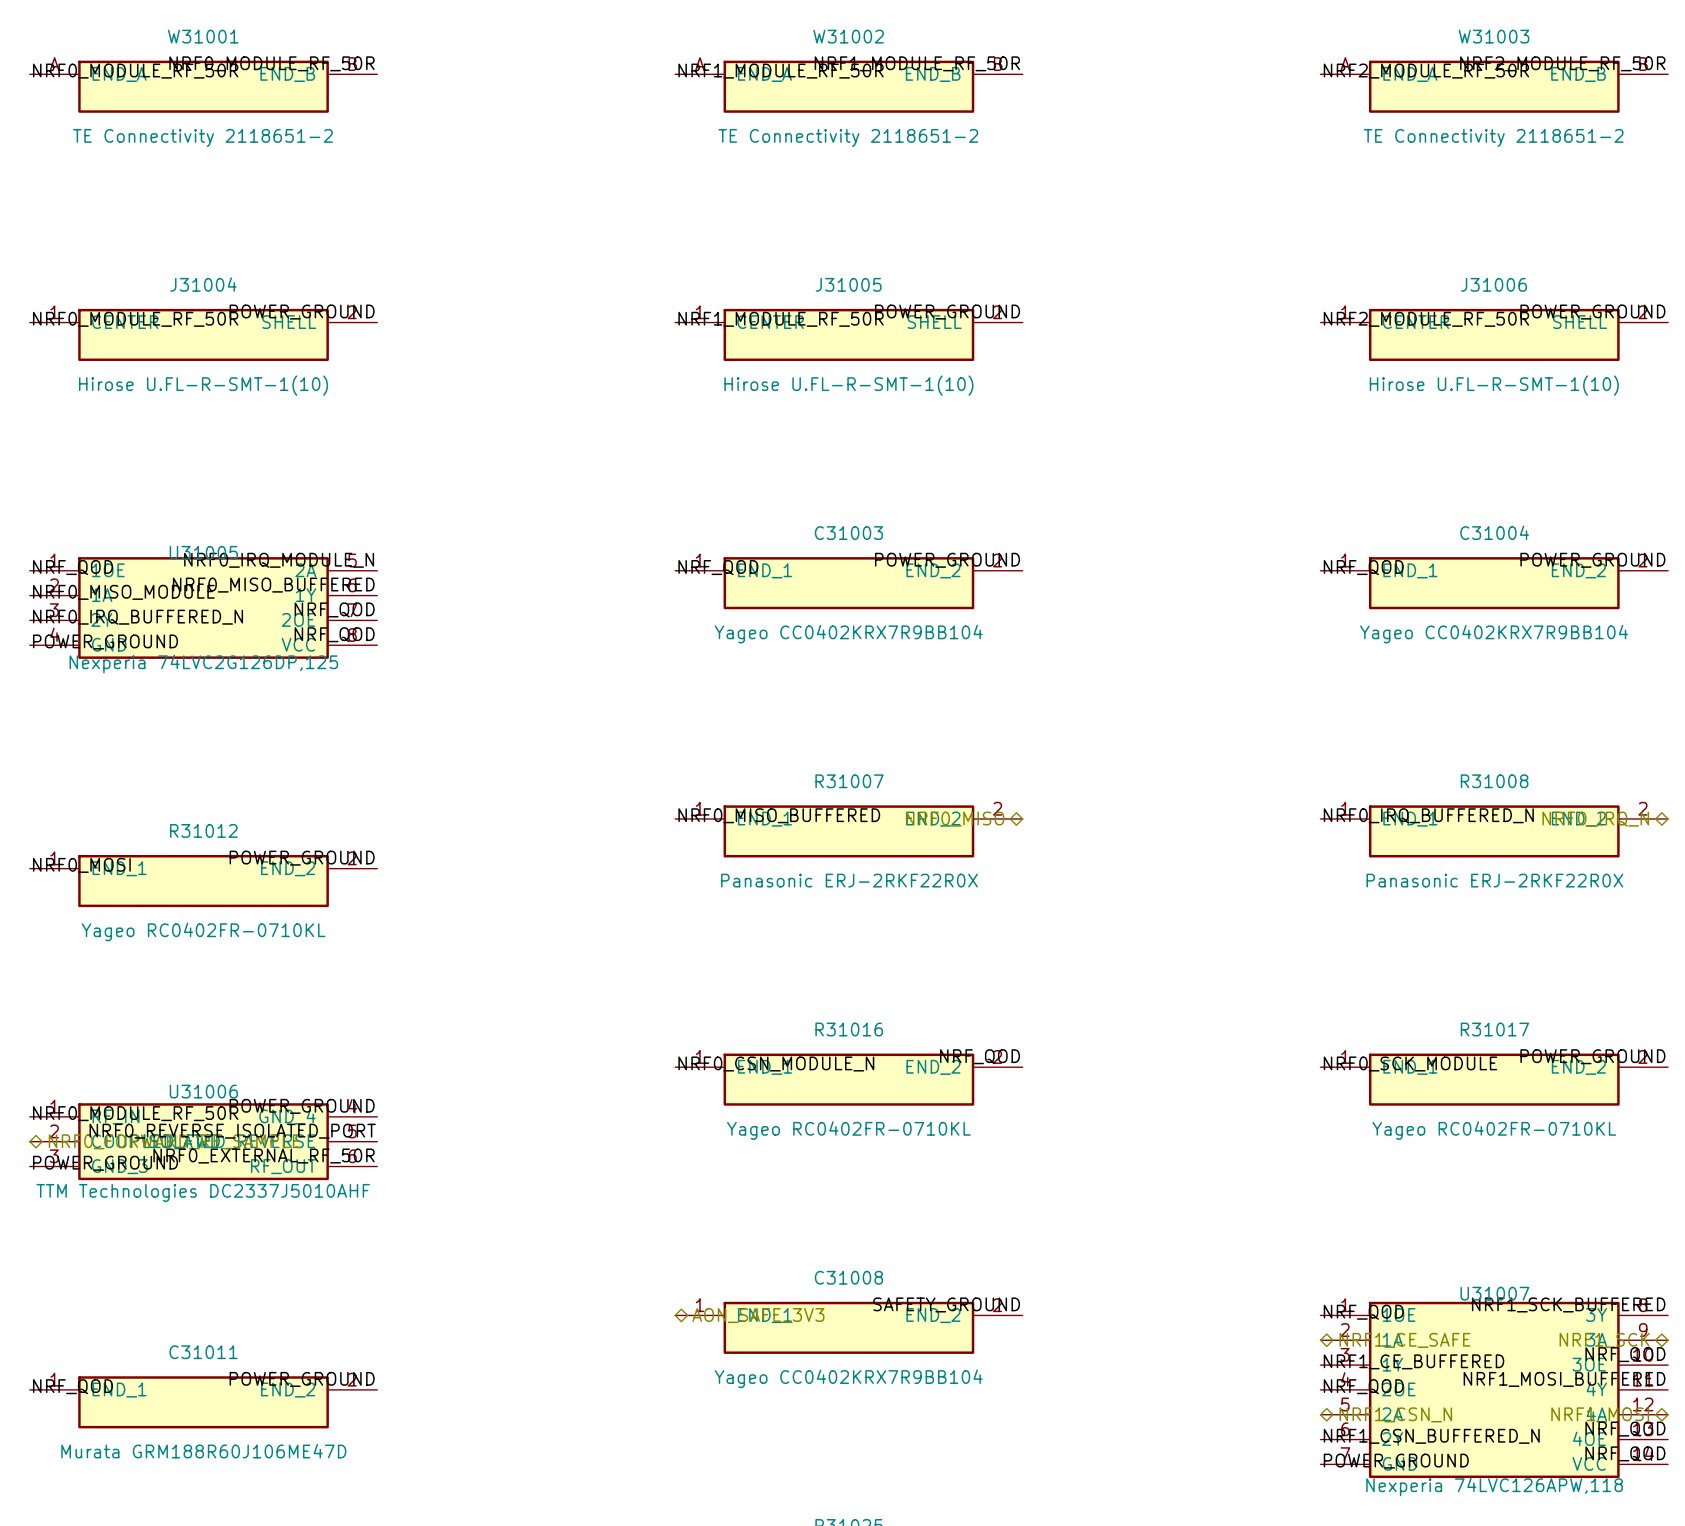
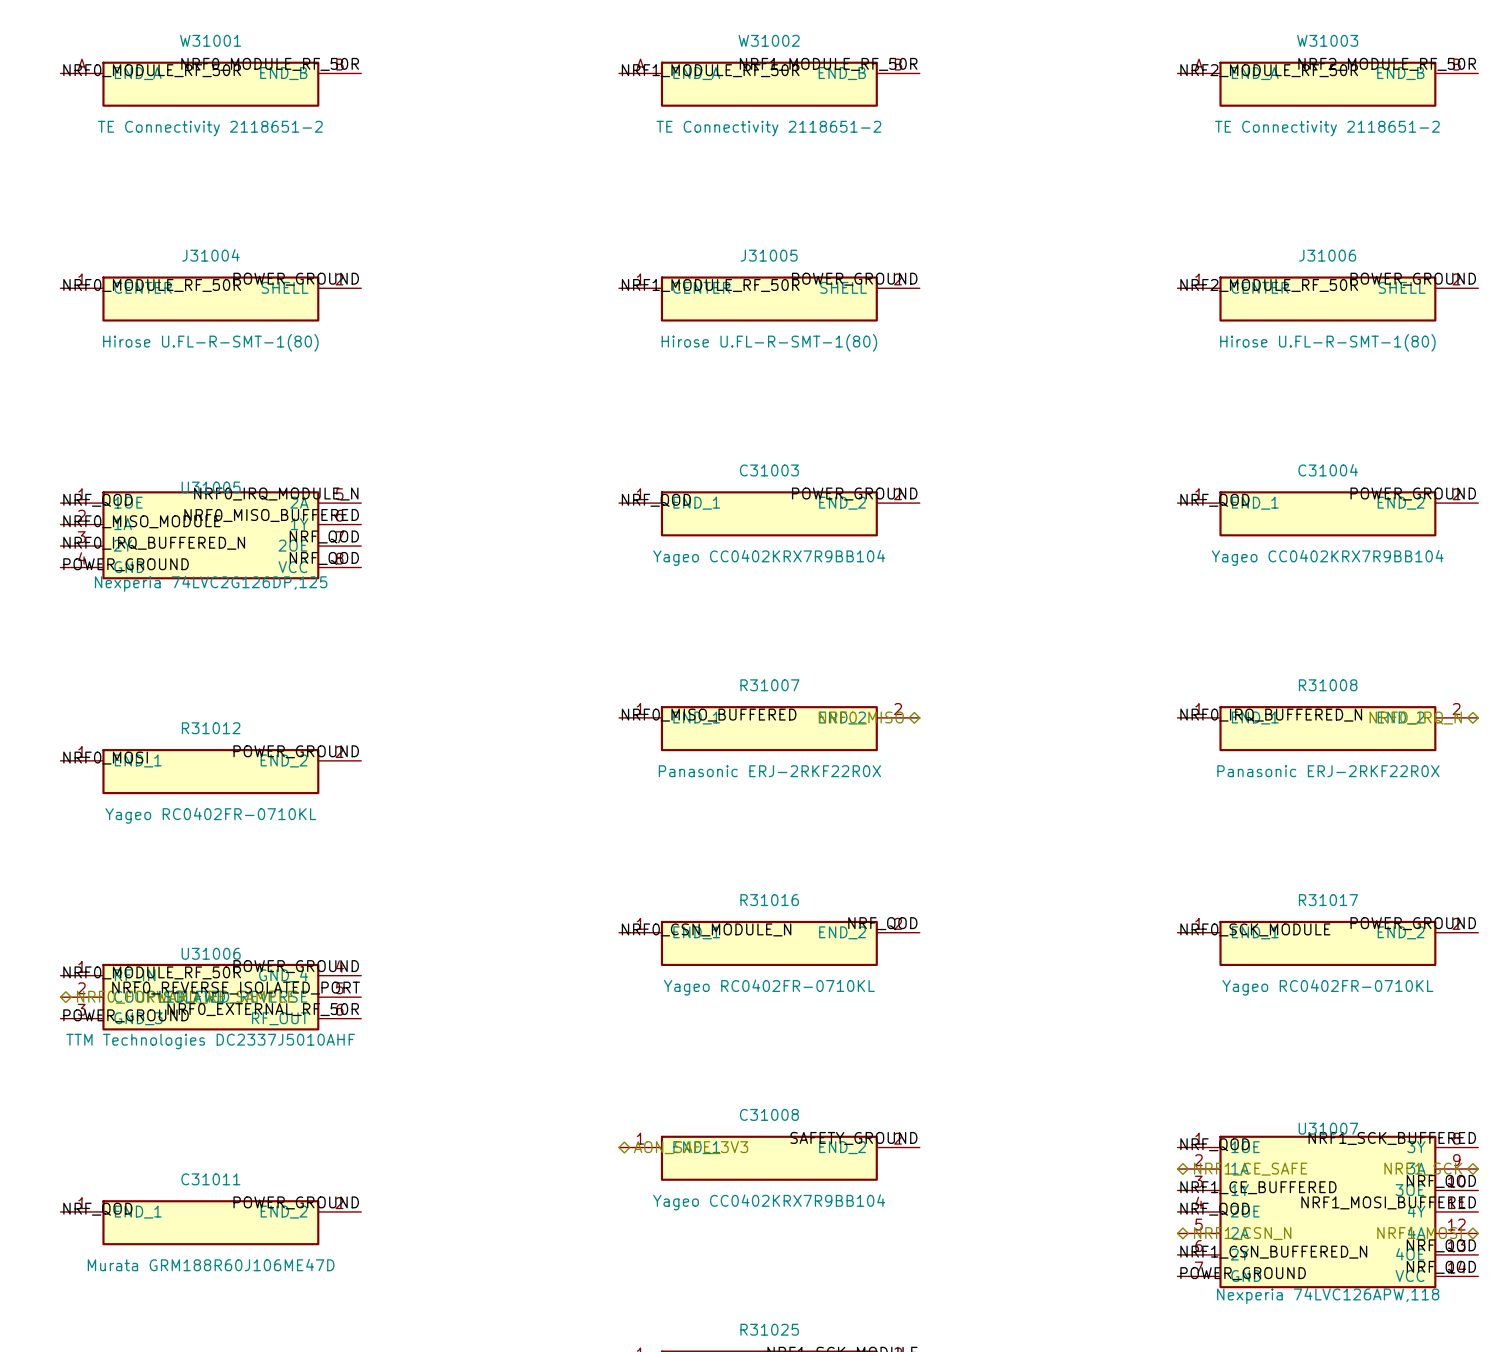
J31004 value: Hirose U.FL-R-SMT-1(10) (203, 385) -> Hirose U.FL-R-SMT-1(80) (210, 342)
J31005 value: Hirose U.FL-R-SMT-1(10) (848, 385) -> Hirose U.FL-R-SMT-1(80) (769, 342)
J31006 value: Hirose U.FL-R-SMT-1(10) (1494, 385) -> Hirose U.FL-R-SMT-1(80) (1327, 342)

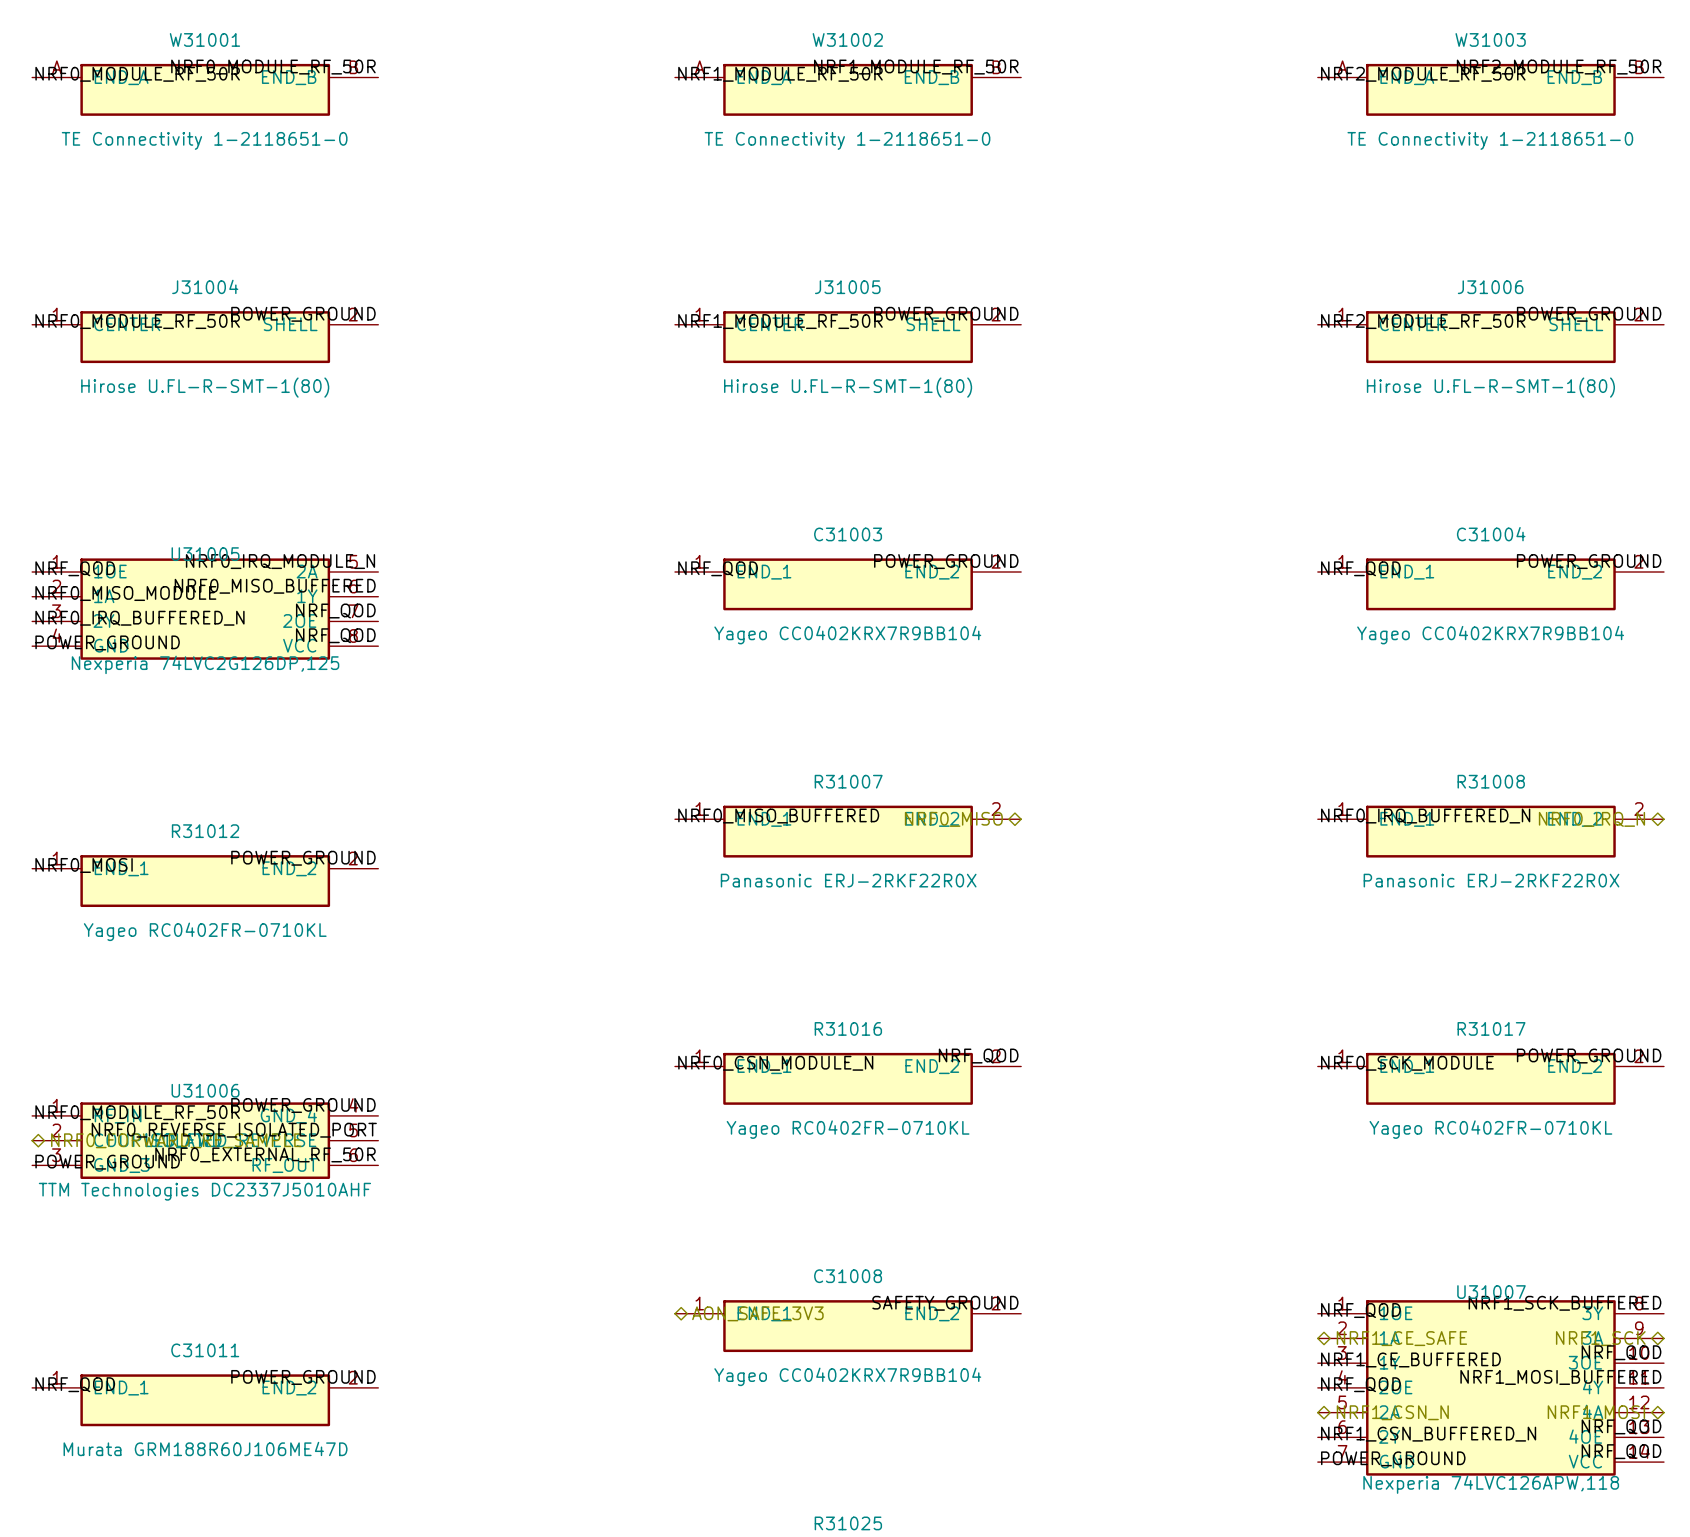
W31001 value: TE Connectivity 2118651-2 (210, 128) -> TE Connectivity 1-2118651-0 (204, 140)
W31002 value: TE Connectivity 2118651-2 (768, 128) -> TE Connectivity 1-2118651-0 (847, 140)
W31003 value: TE Connectivity 2118651-2 (1327, 128) -> TE Connectivity 1-2118651-0 (1490, 140)

